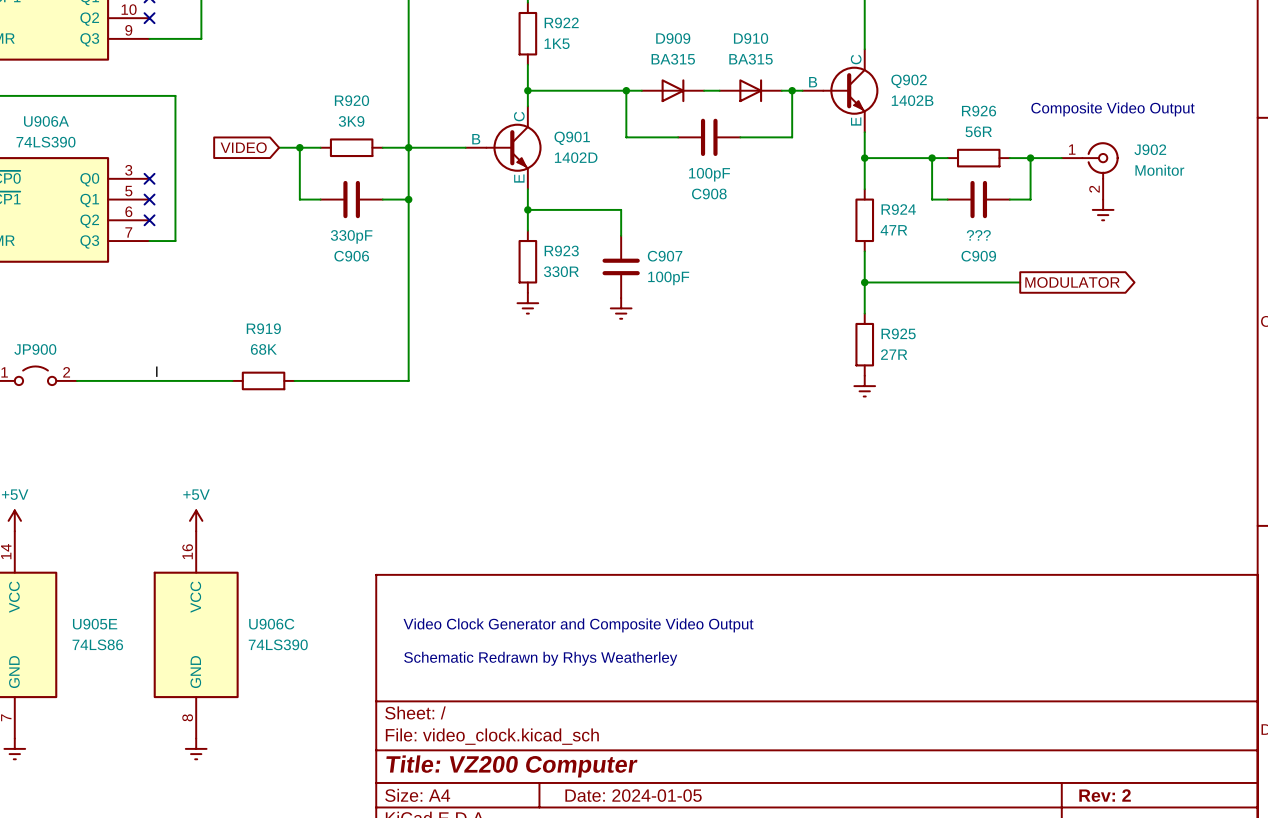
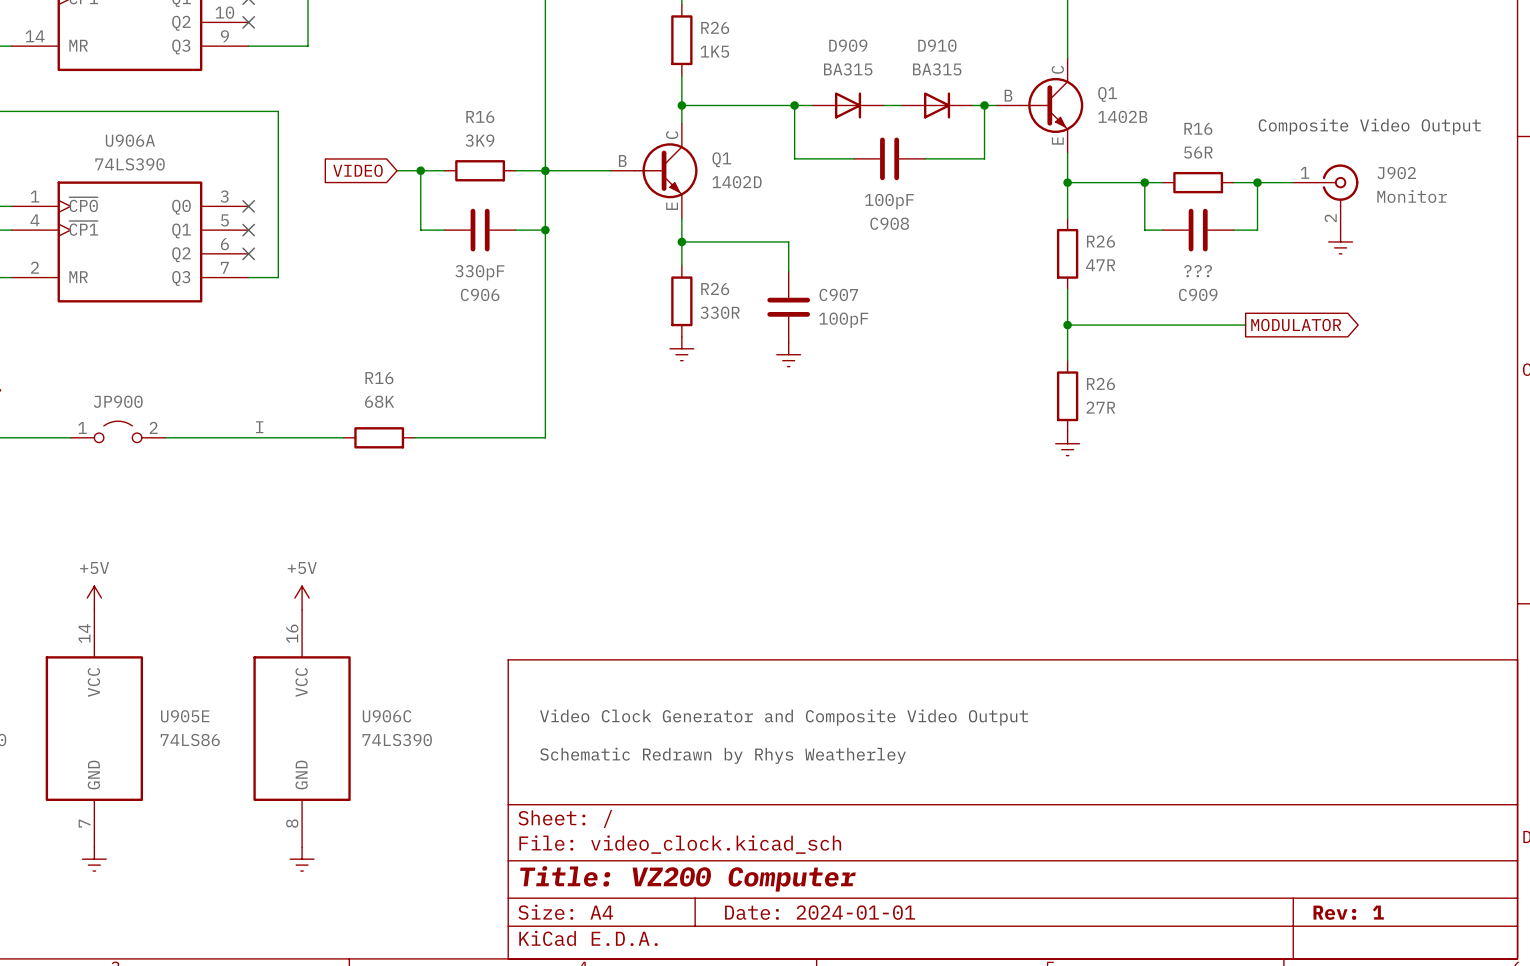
R922 name: R922 (561, 22) -> R26 (715, 27)
Q902 name: Q902 (909, 81) -> Q1 (1107, 94)
R920 name: R920 (351, 100) -> R16 (480, 117)
R926 name: R926 (979, 111) -> R16 (1198, 128)
Q901 name: Q901 (572, 138) -> Q1 (721, 159)
R924 name: R924 (898, 209) -> R26 (1100, 241)
R923 name: R923 (561, 250) -> R26 (715, 289)
R919 name: R919 (263, 328) -> R16 (379, 378)
R925 name: R925 (898, 333) -> R26 (1100, 383)
title block: Date: 2024-01-05 (633, 795) -> Date: 2024-01-01 (820, 912)
title block: Rev: 2 (1105, 795) -> Rev: 1 (1348, 912)

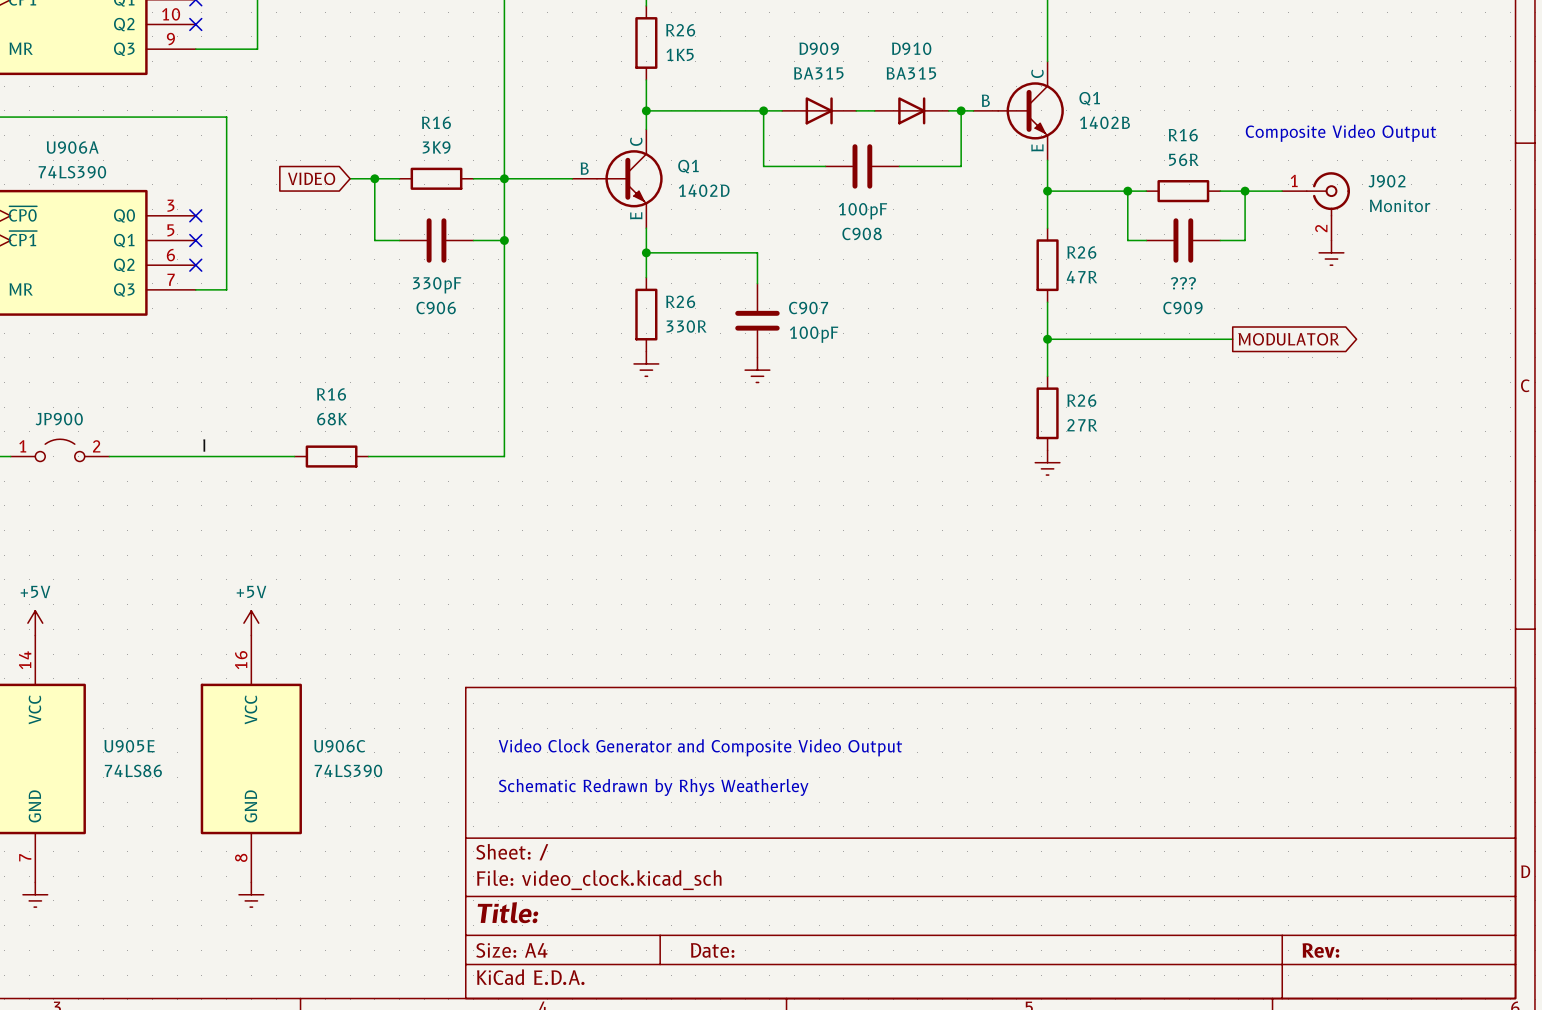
title block: Title: VZ200 Computer (687, 878) -> Title: (507, 912)
title block: Date: 2024-01-01 (820, 912) -> Date: (712, 950)
title block: Rev: 1 (1348, 912) -> Rev: (1320, 950)

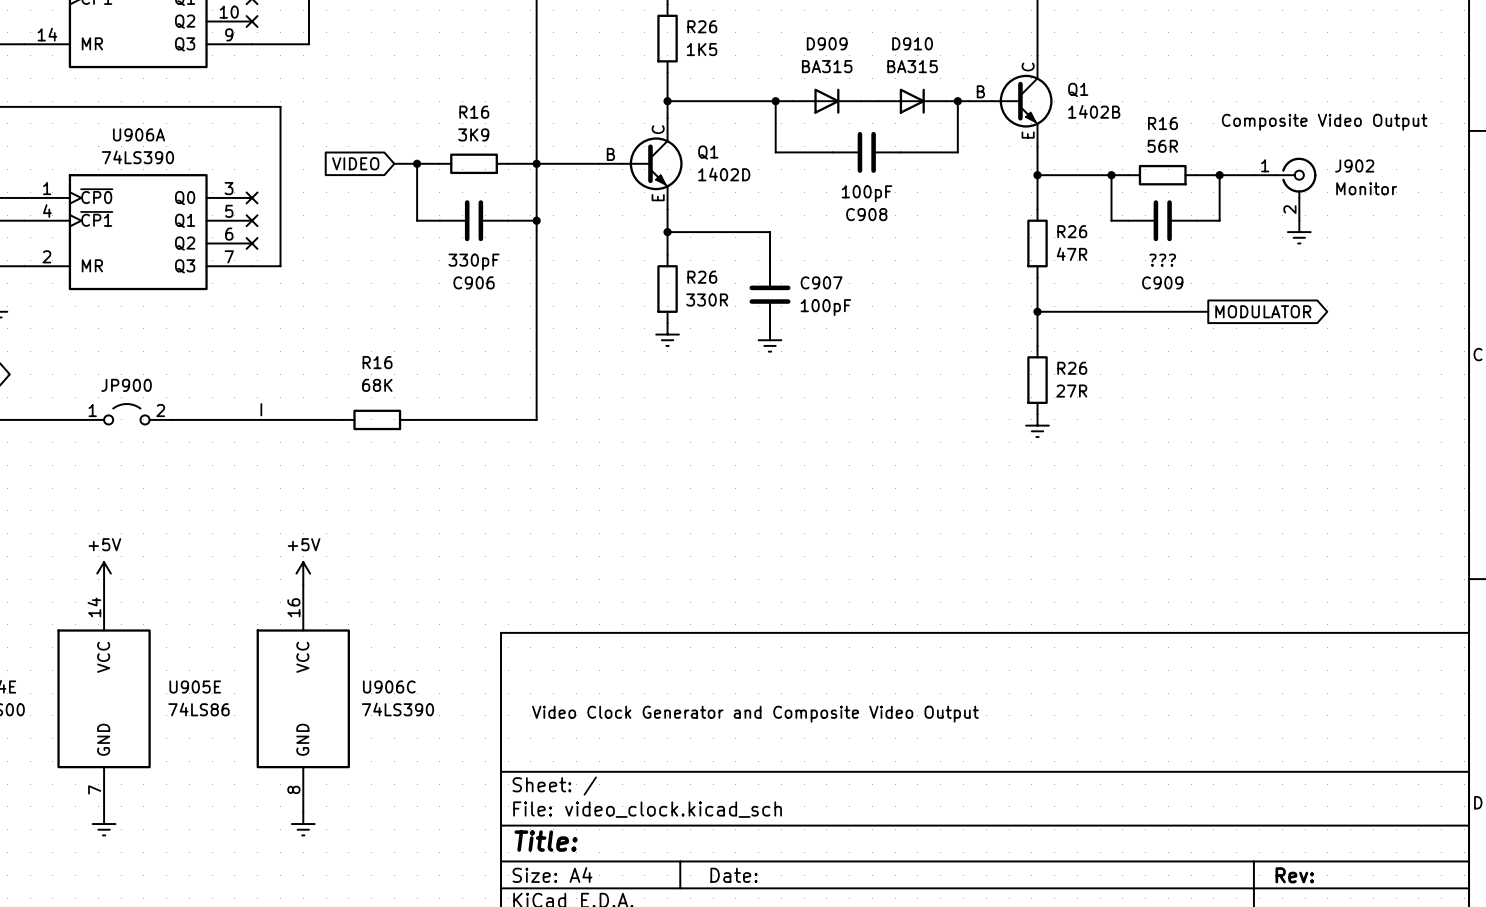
text position: Video Clock Generator and Composite Video Output (700, 747) -> Video Clock Generator and Composite Video Output (755, 714)
text: Schematic Redrawn by Rhys Weatherley (653, 787) -> none

